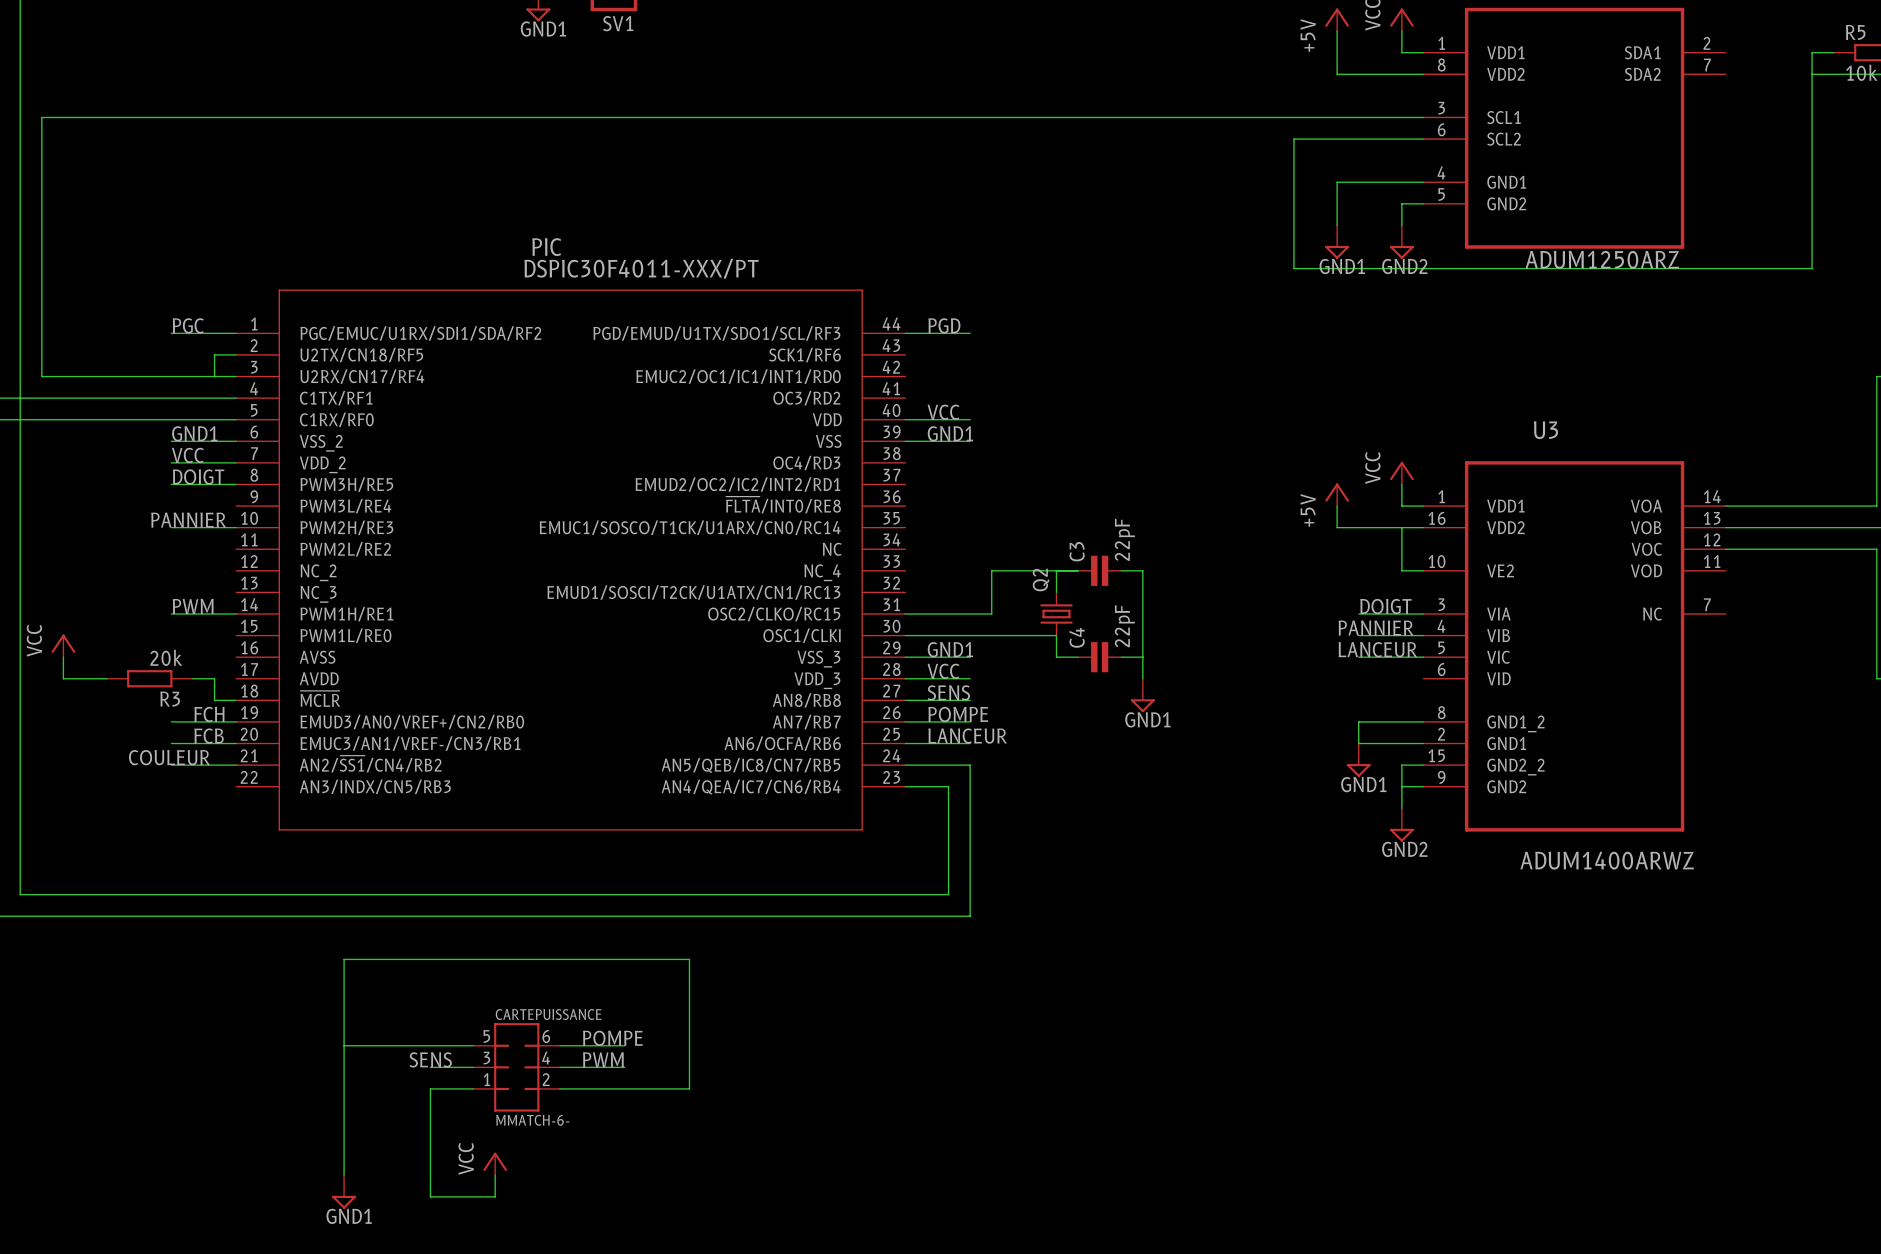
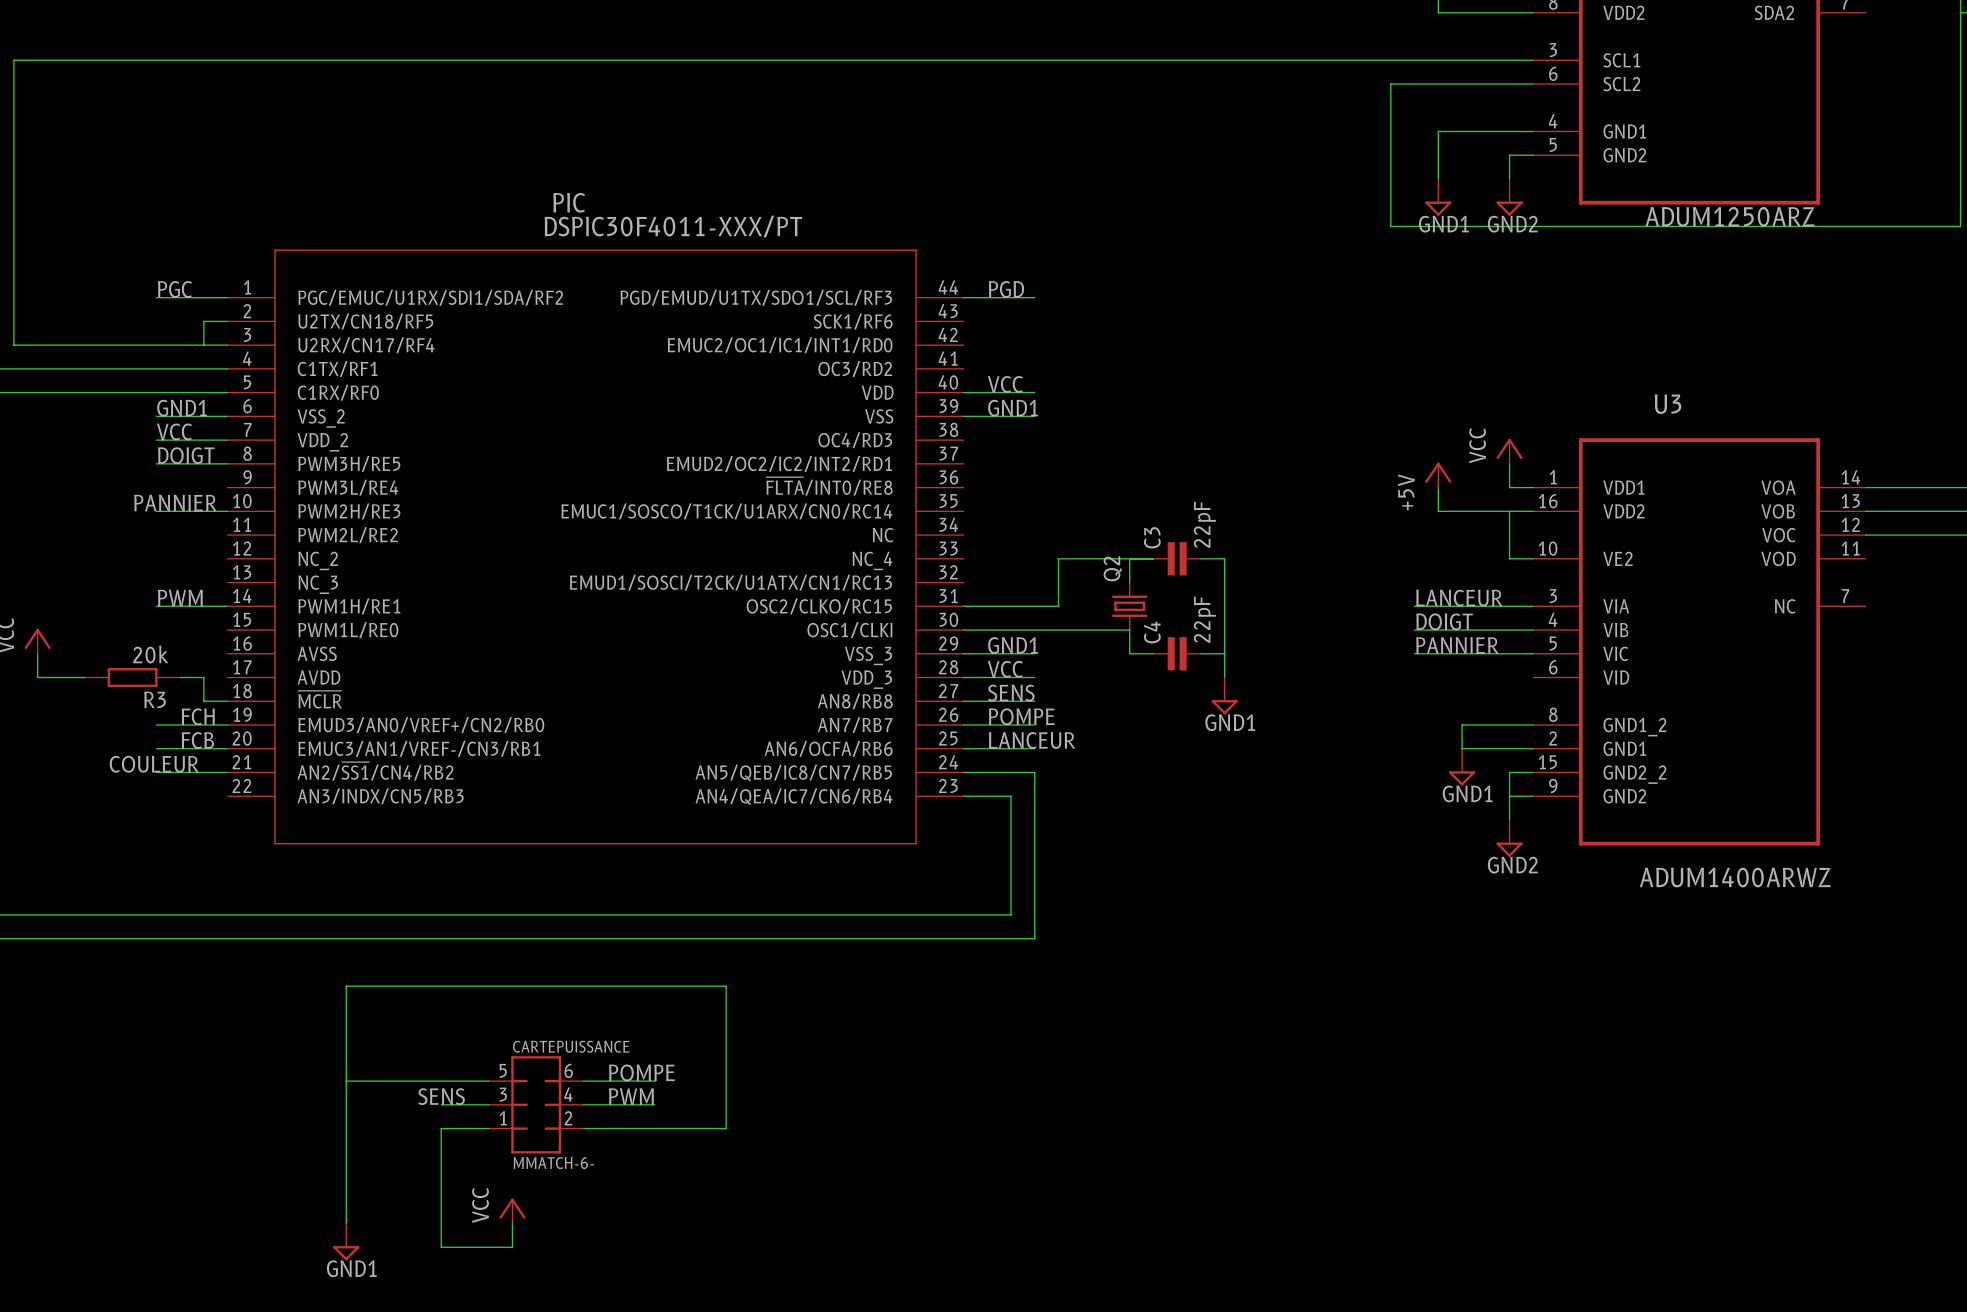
label position: DOIGT (1385, 606) -> DOIGT (1444, 621)
wire: none -> (1414, 606) (1462, 606)
label position: PANNIER (1376, 628) -> PANNIER (1457, 645)
wire: none -> (1414, 630) (1462, 630)
label position: LANCEUR (1377, 649) -> LANCEUR (1459, 598)
wire: none -> (1414, 653) (1462, 653)

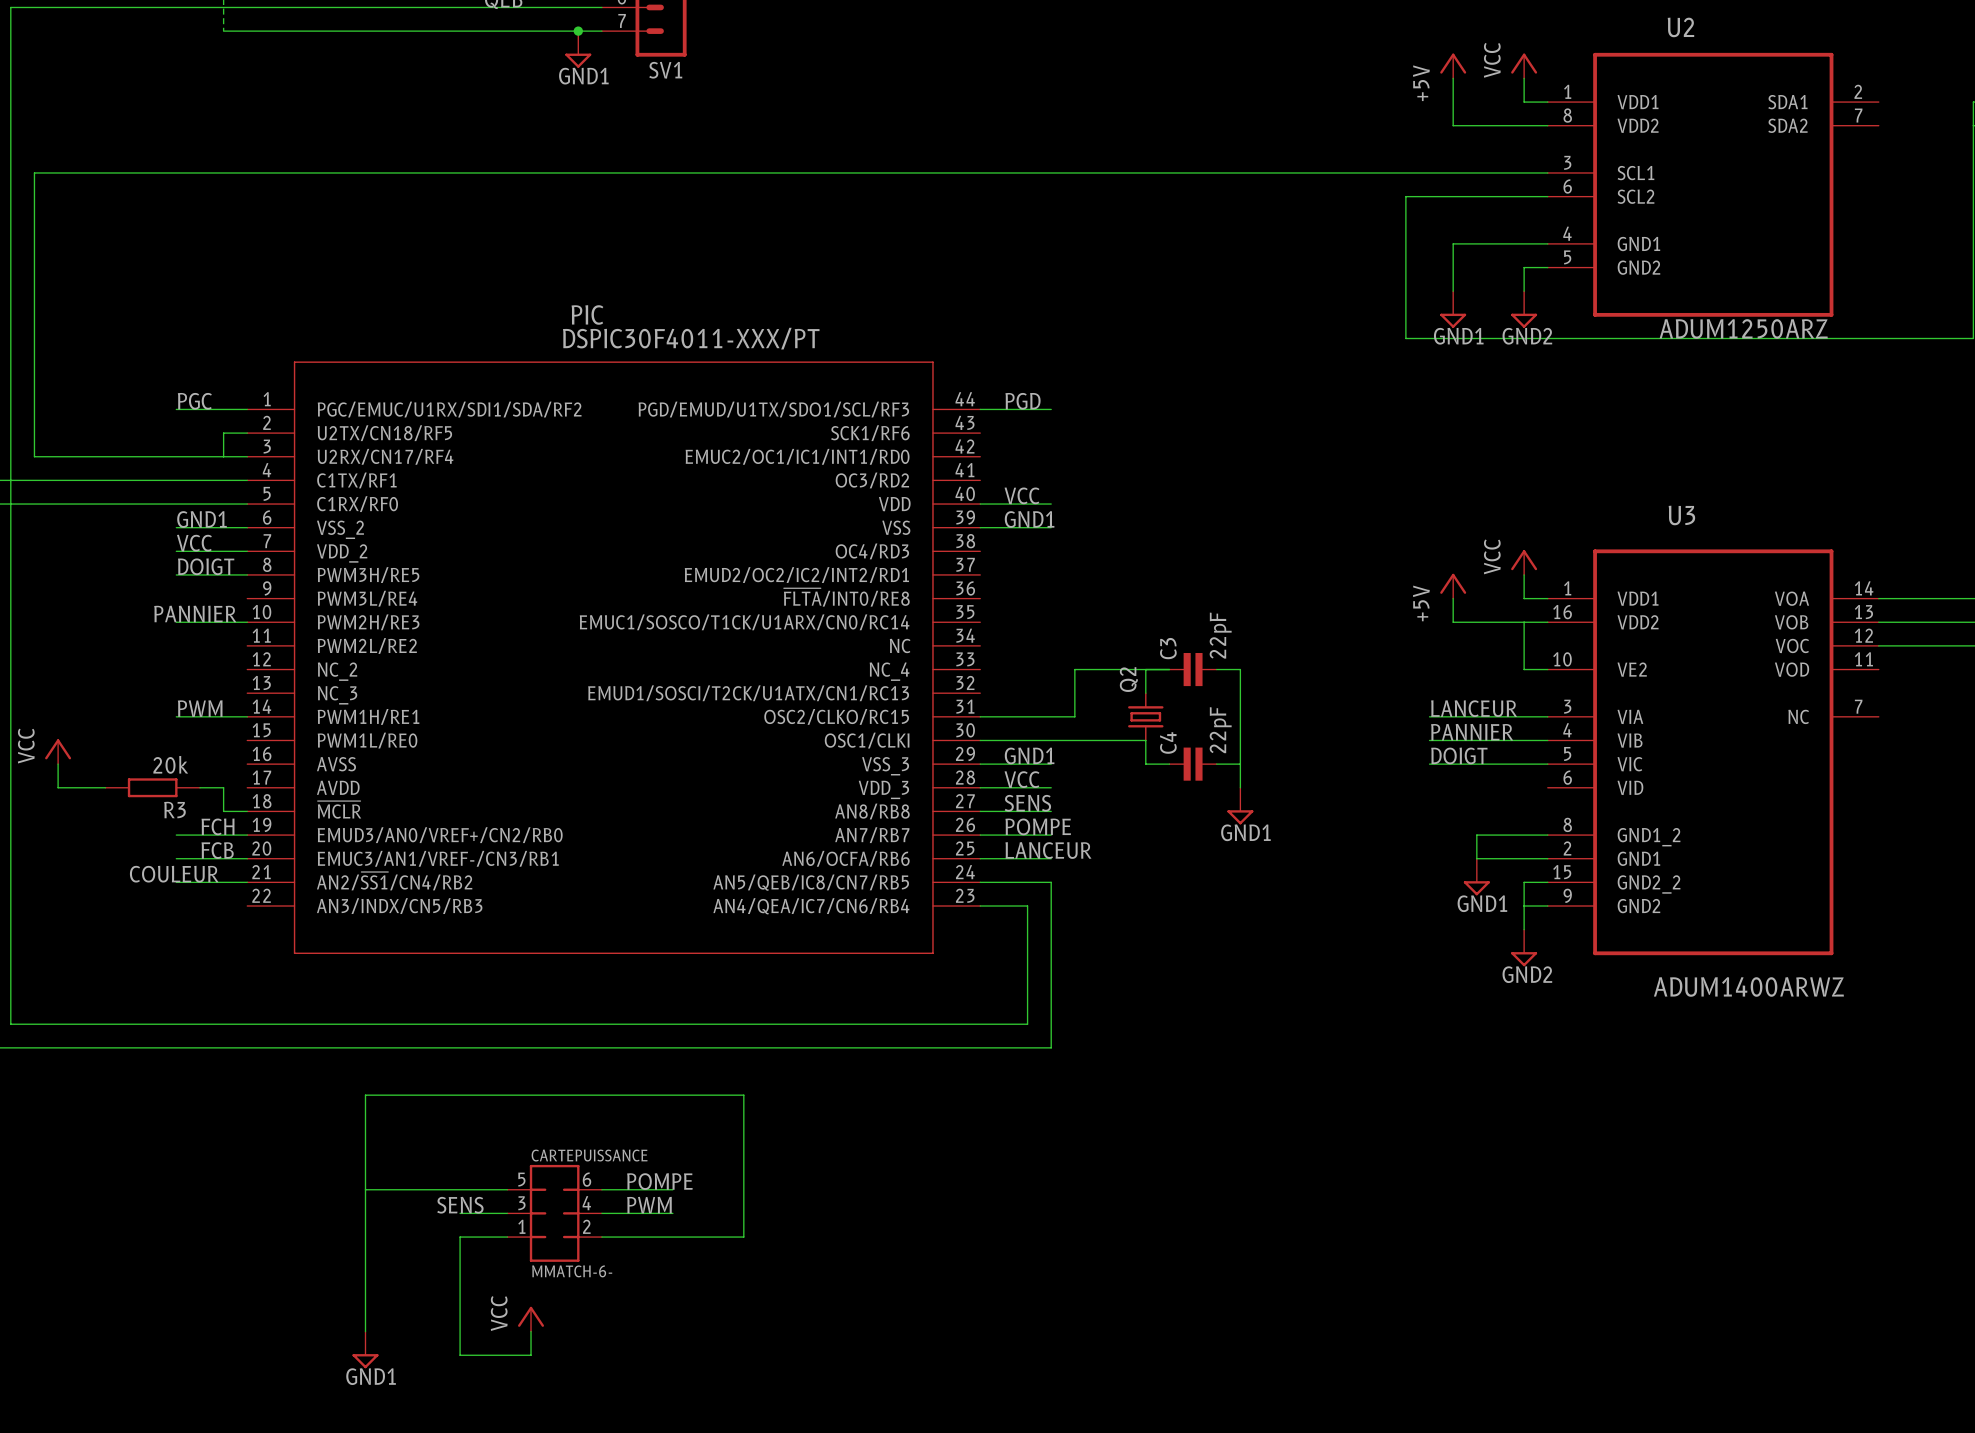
label: DOIGT (1444, 621) -> PANNIER (1472, 732)
label: PANNIER (1457, 645) -> DOIGT (1459, 755)

